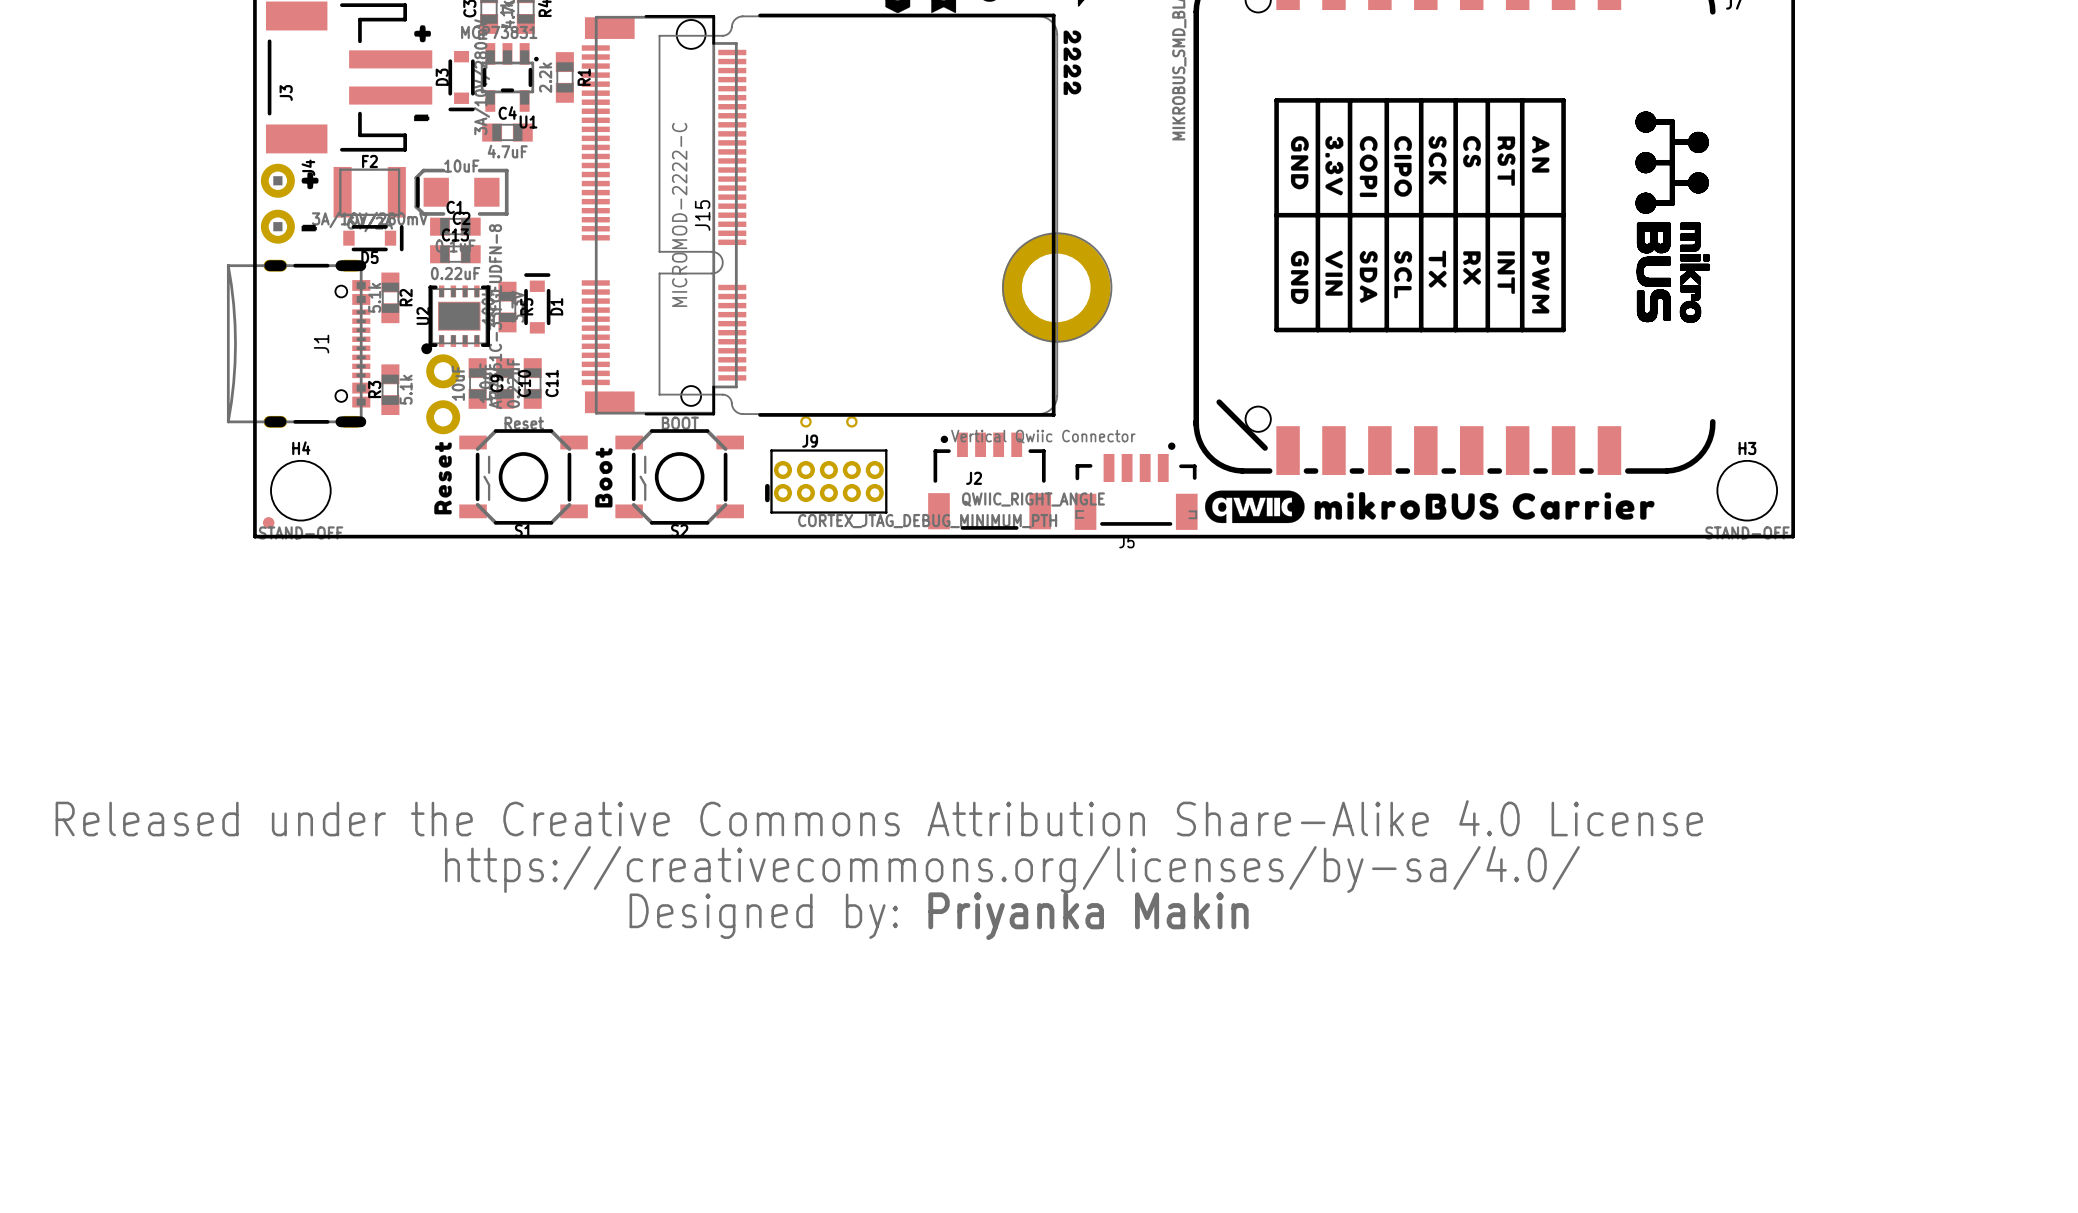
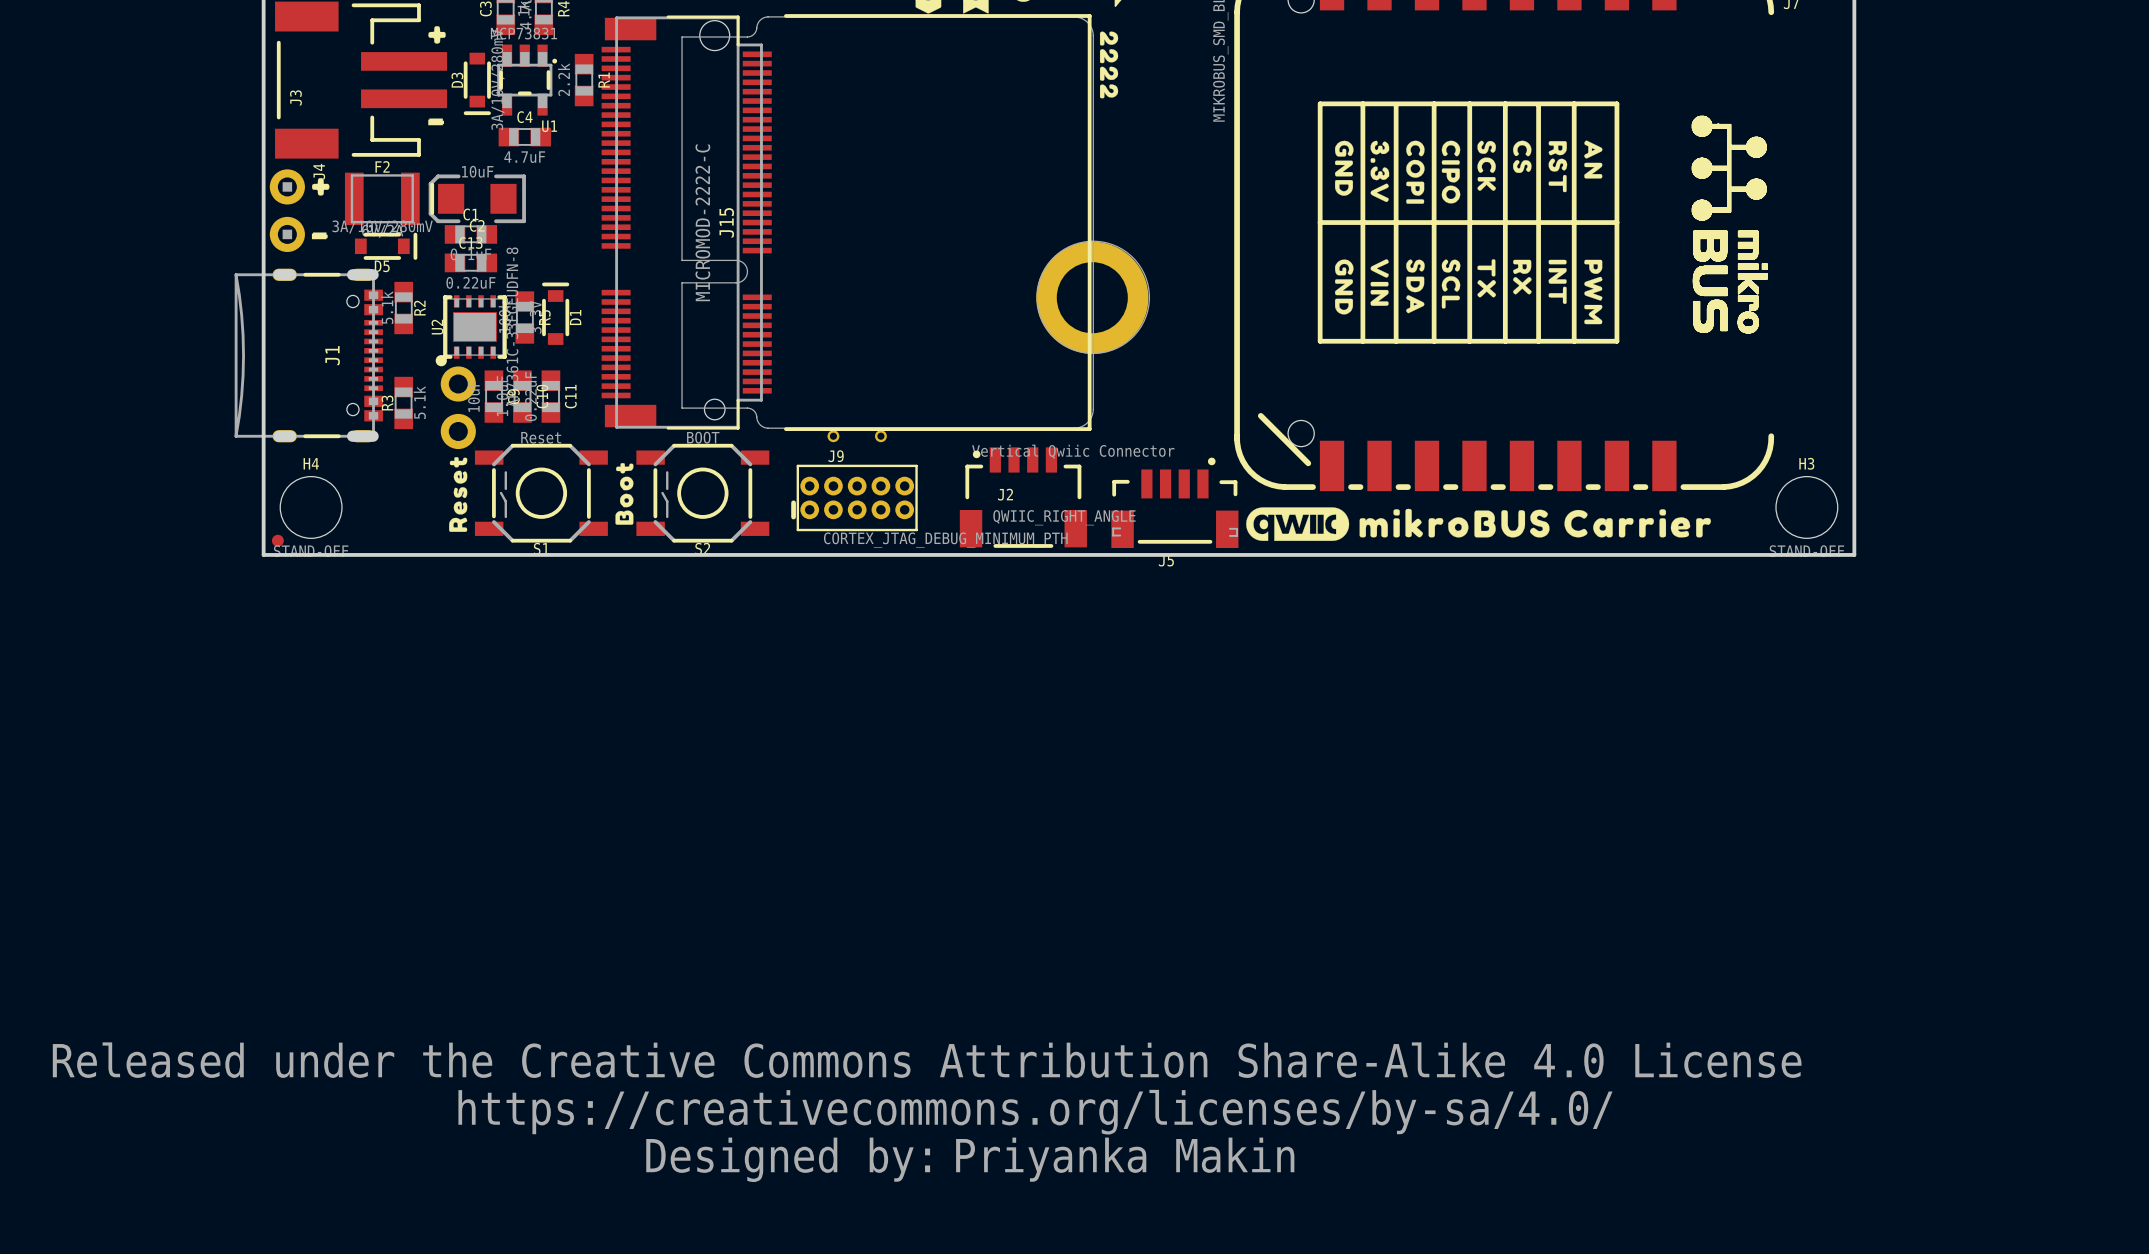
drawing position: (879, 869) -> (927, 1112)
text position: Priyanka Makin (1088, 916) -> Priyanka Makin (1125, 1159)

